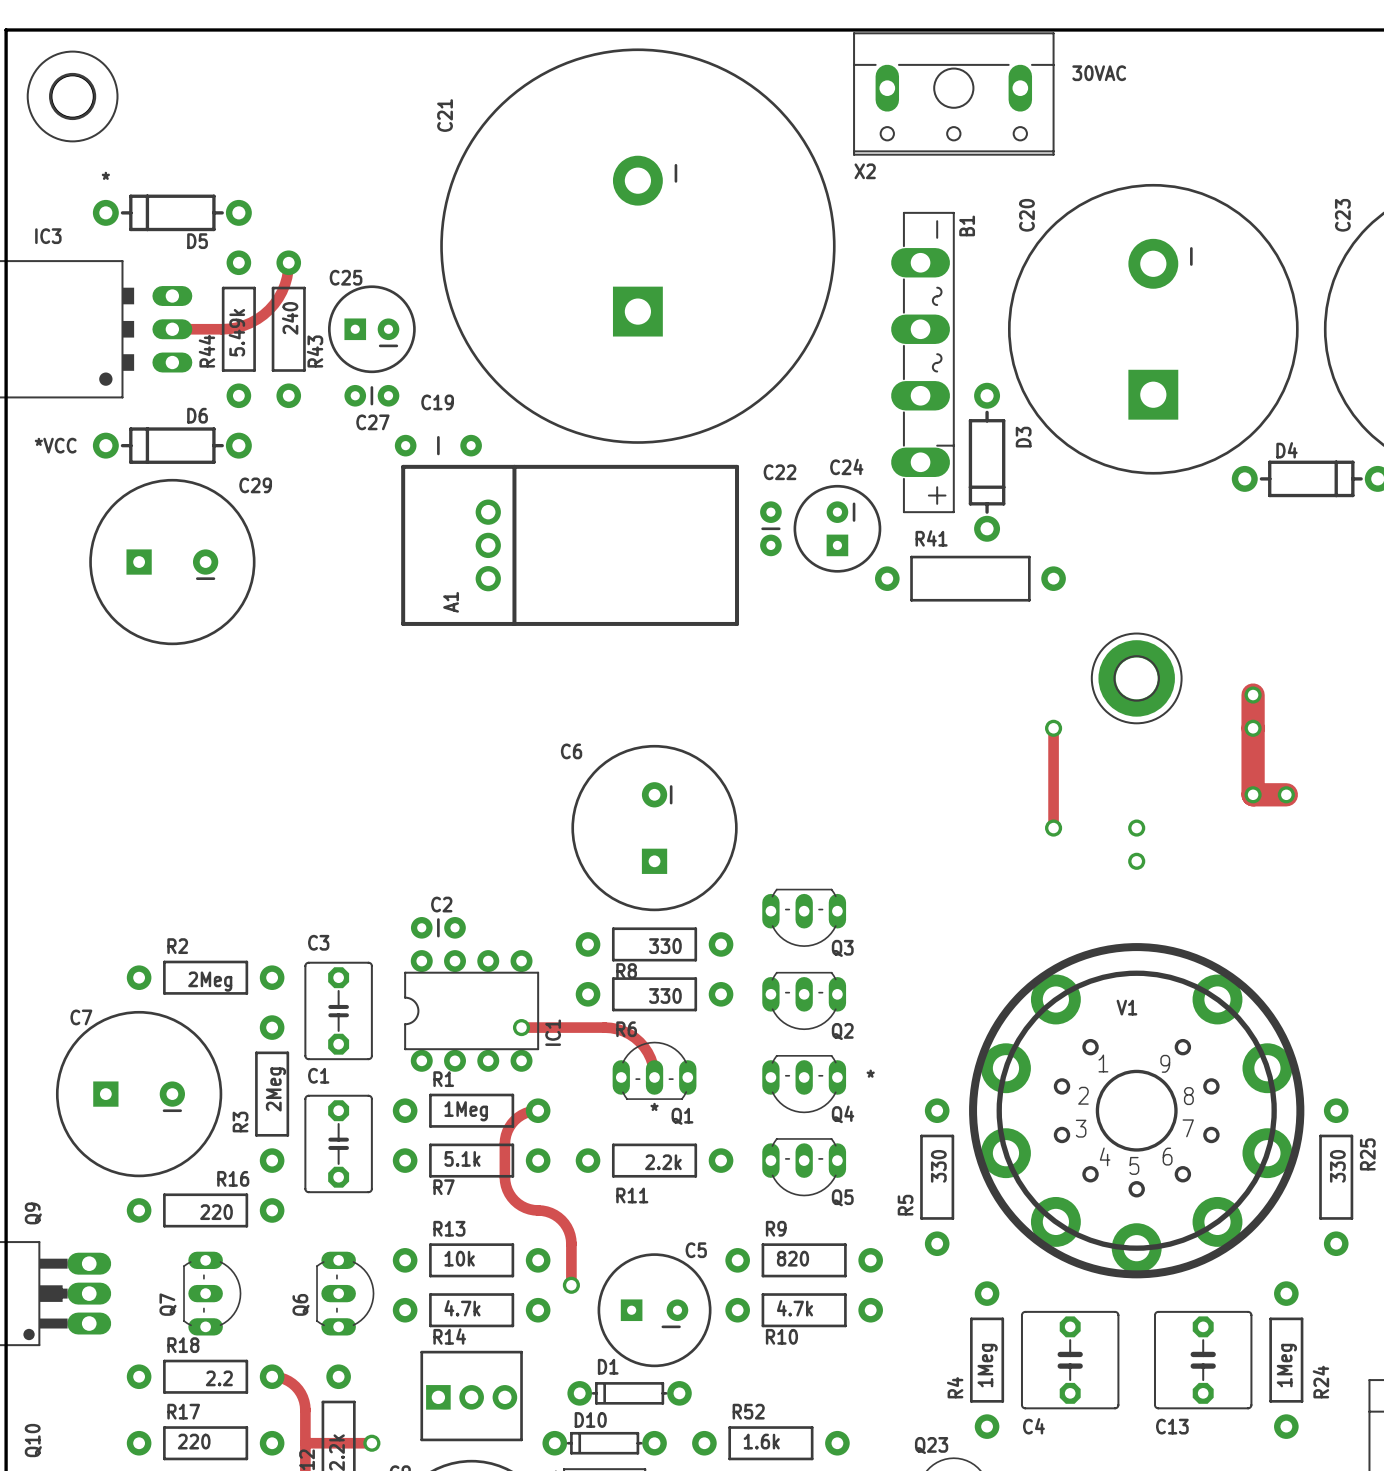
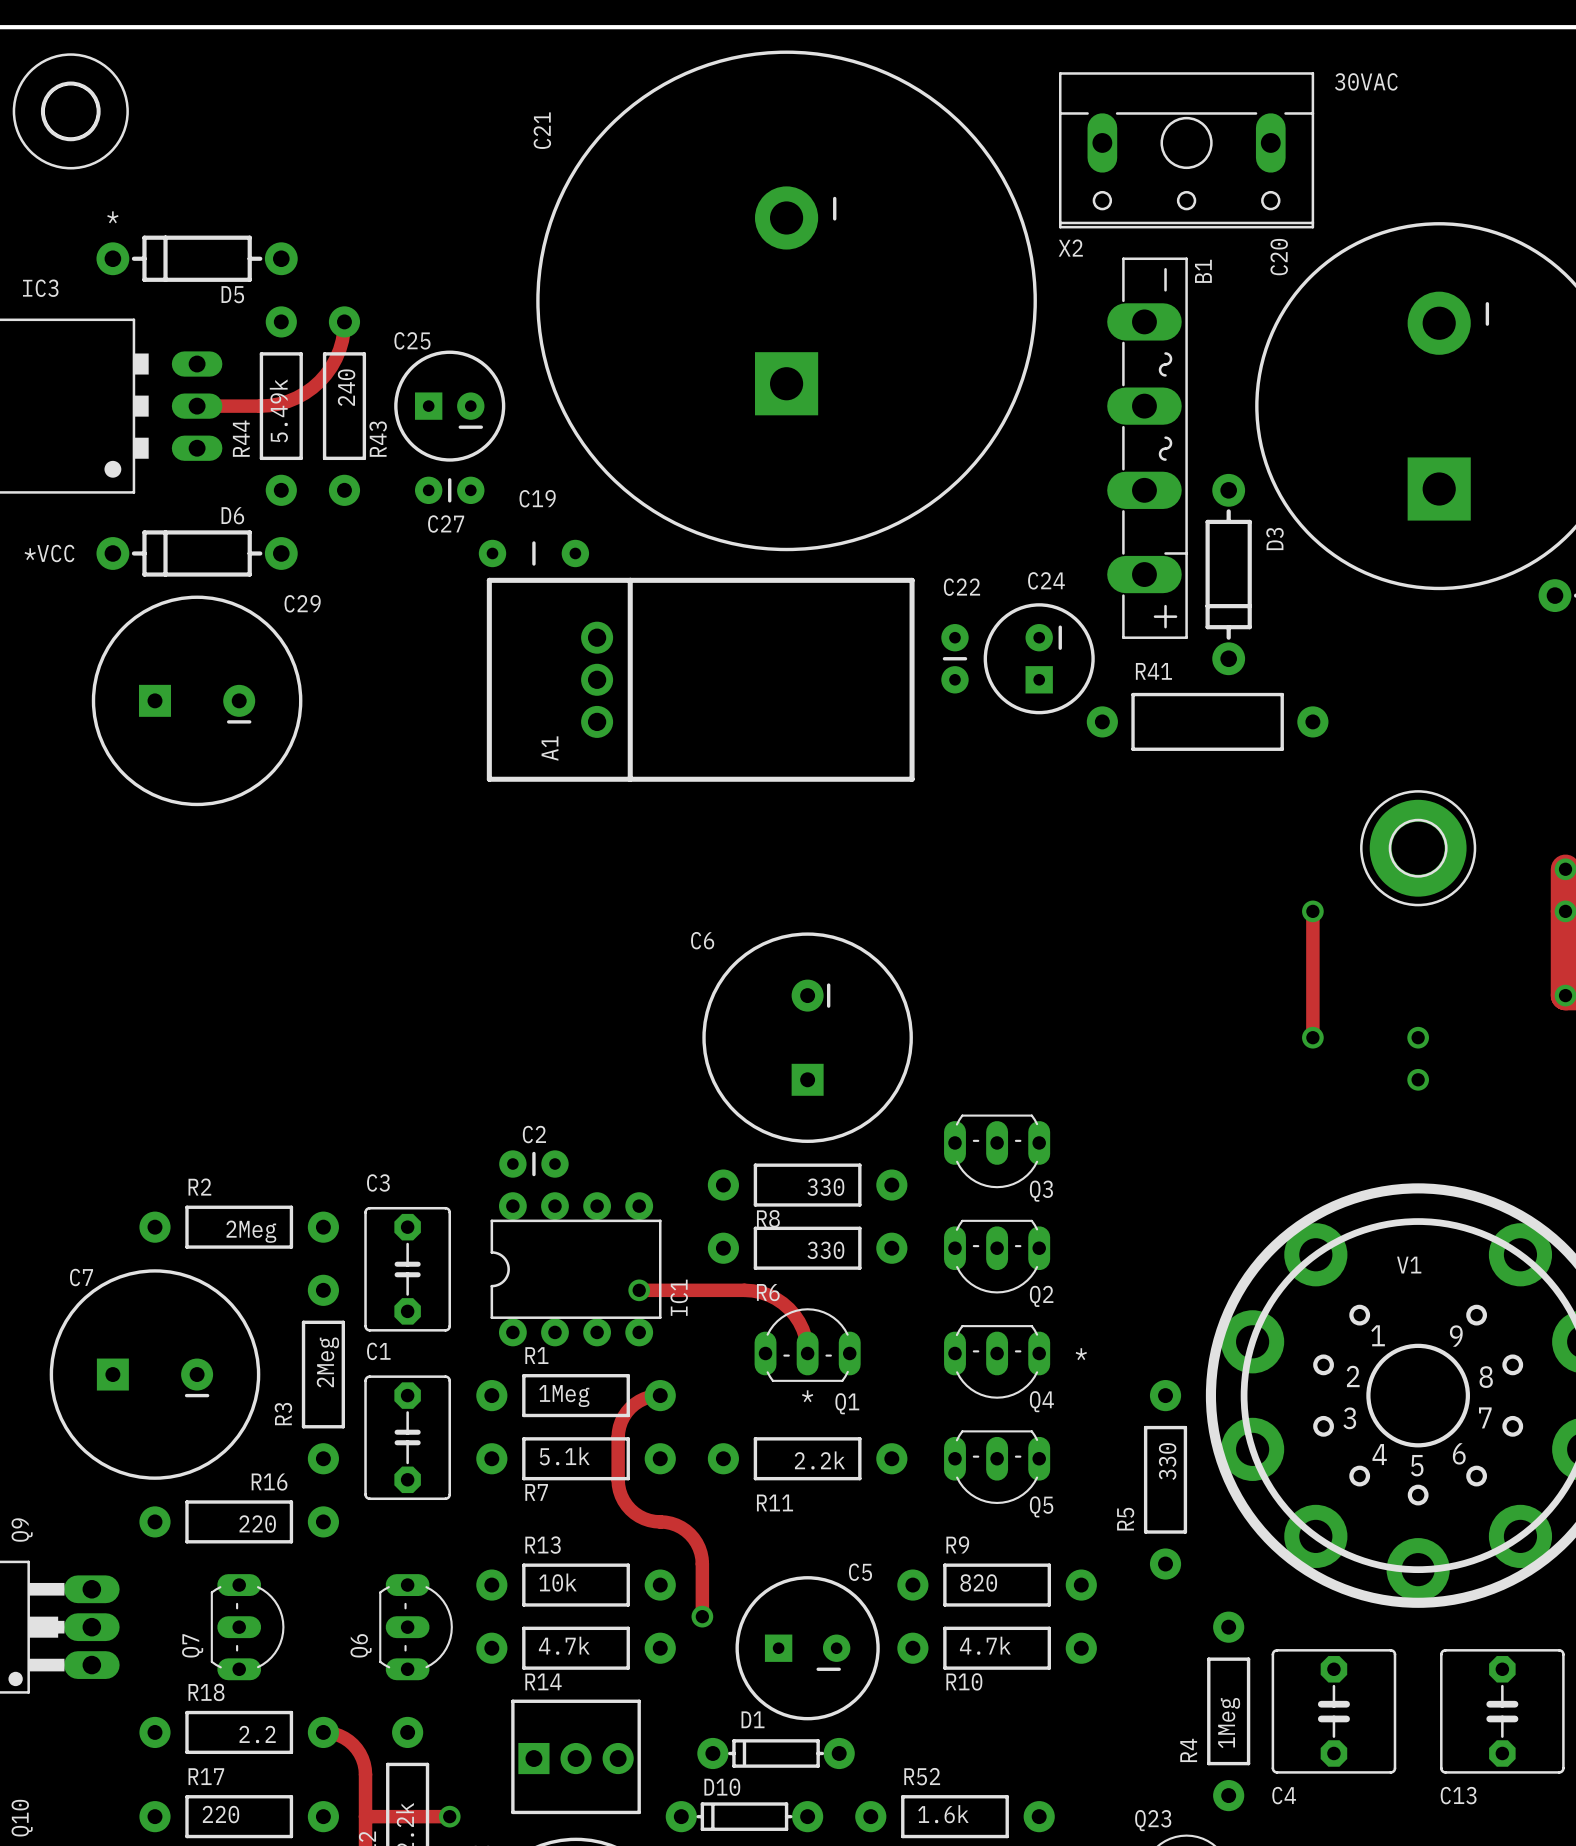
X2 position: (953, 93) -> (1186, 150)

